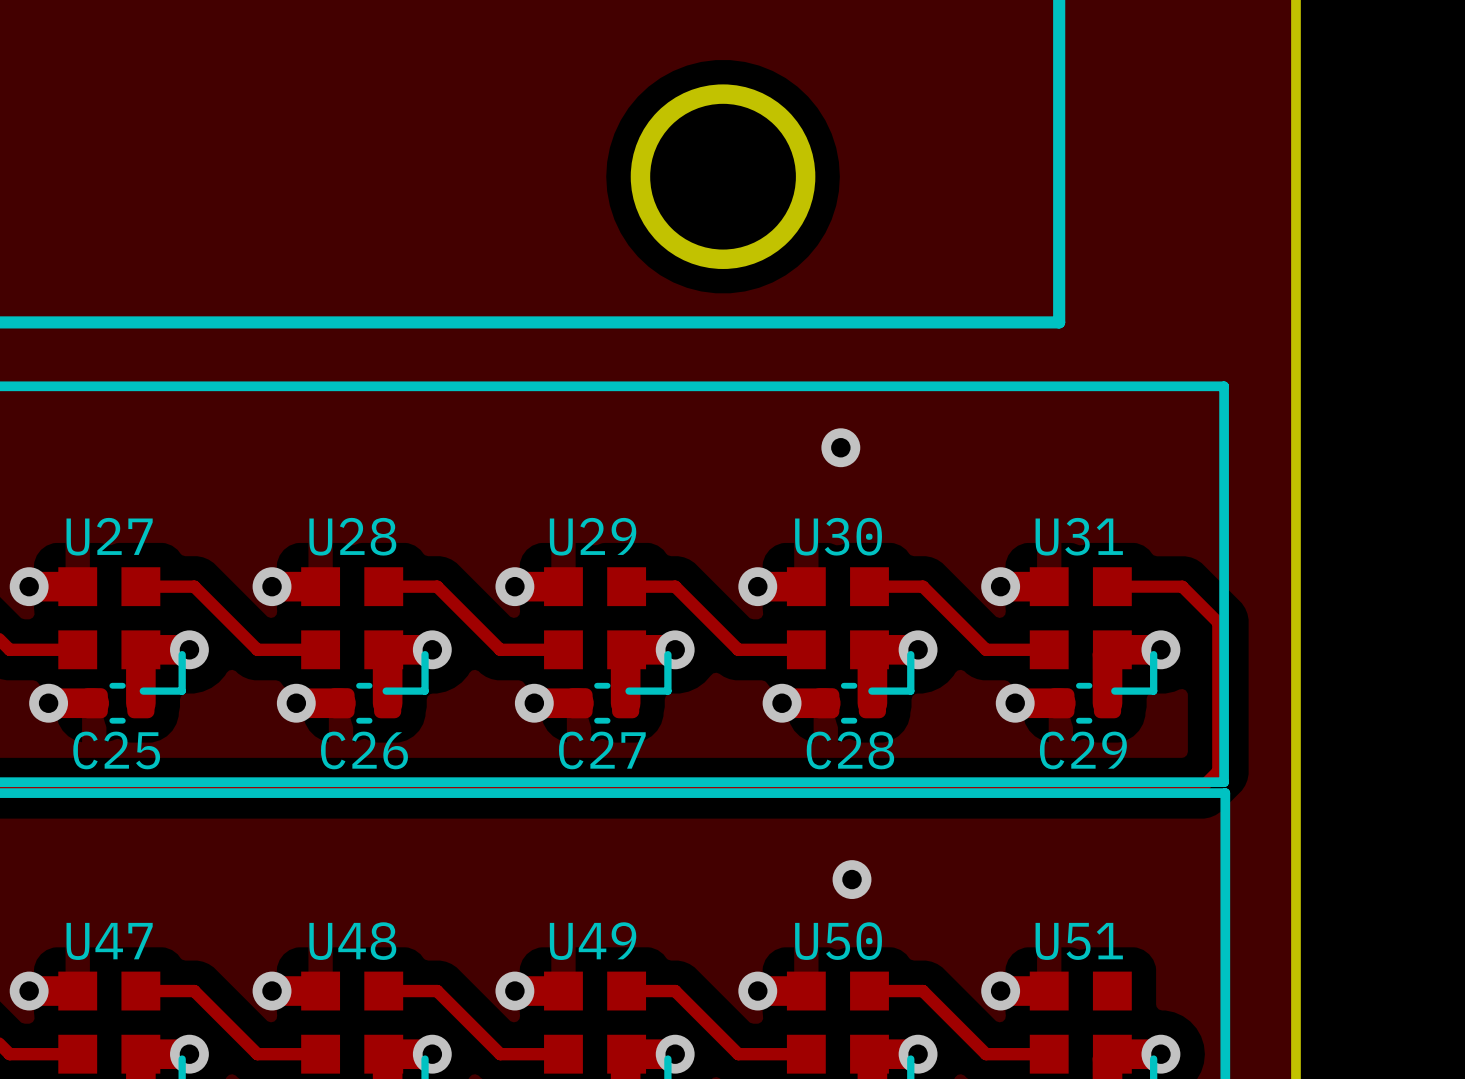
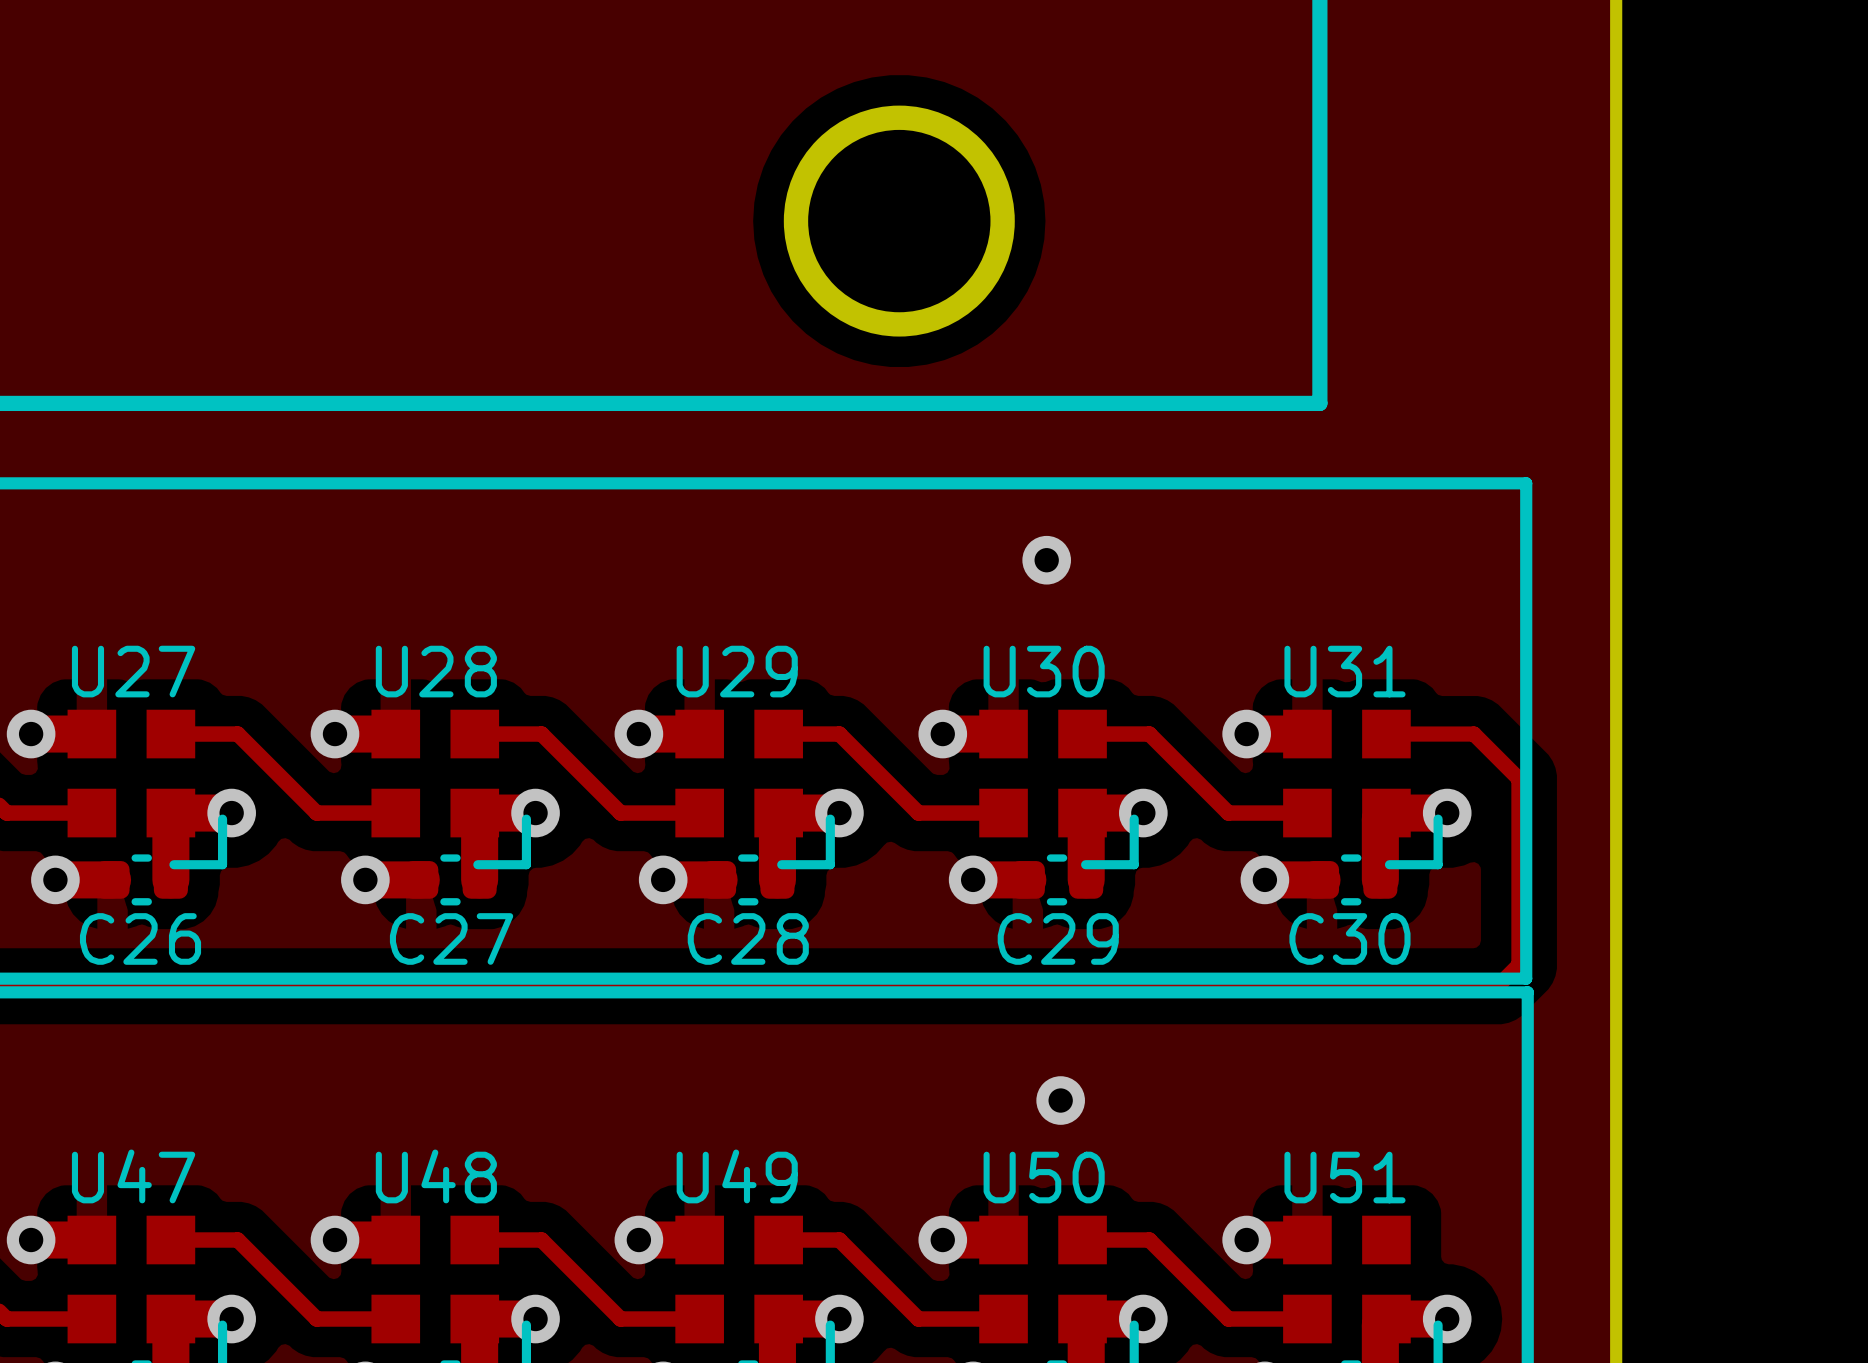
C25 name: C25 (116, 750) -> C26 (140, 938)
C26 name: C26 (364, 750) -> C27 (451, 938)
C27 name: C27 (602, 750) -> C28 (748, 938)
C28 name: C28 (850, 750) -> C29 (1058, 938)
C29 name: C29 (1083, 750) -> C30 (1349, 938)

